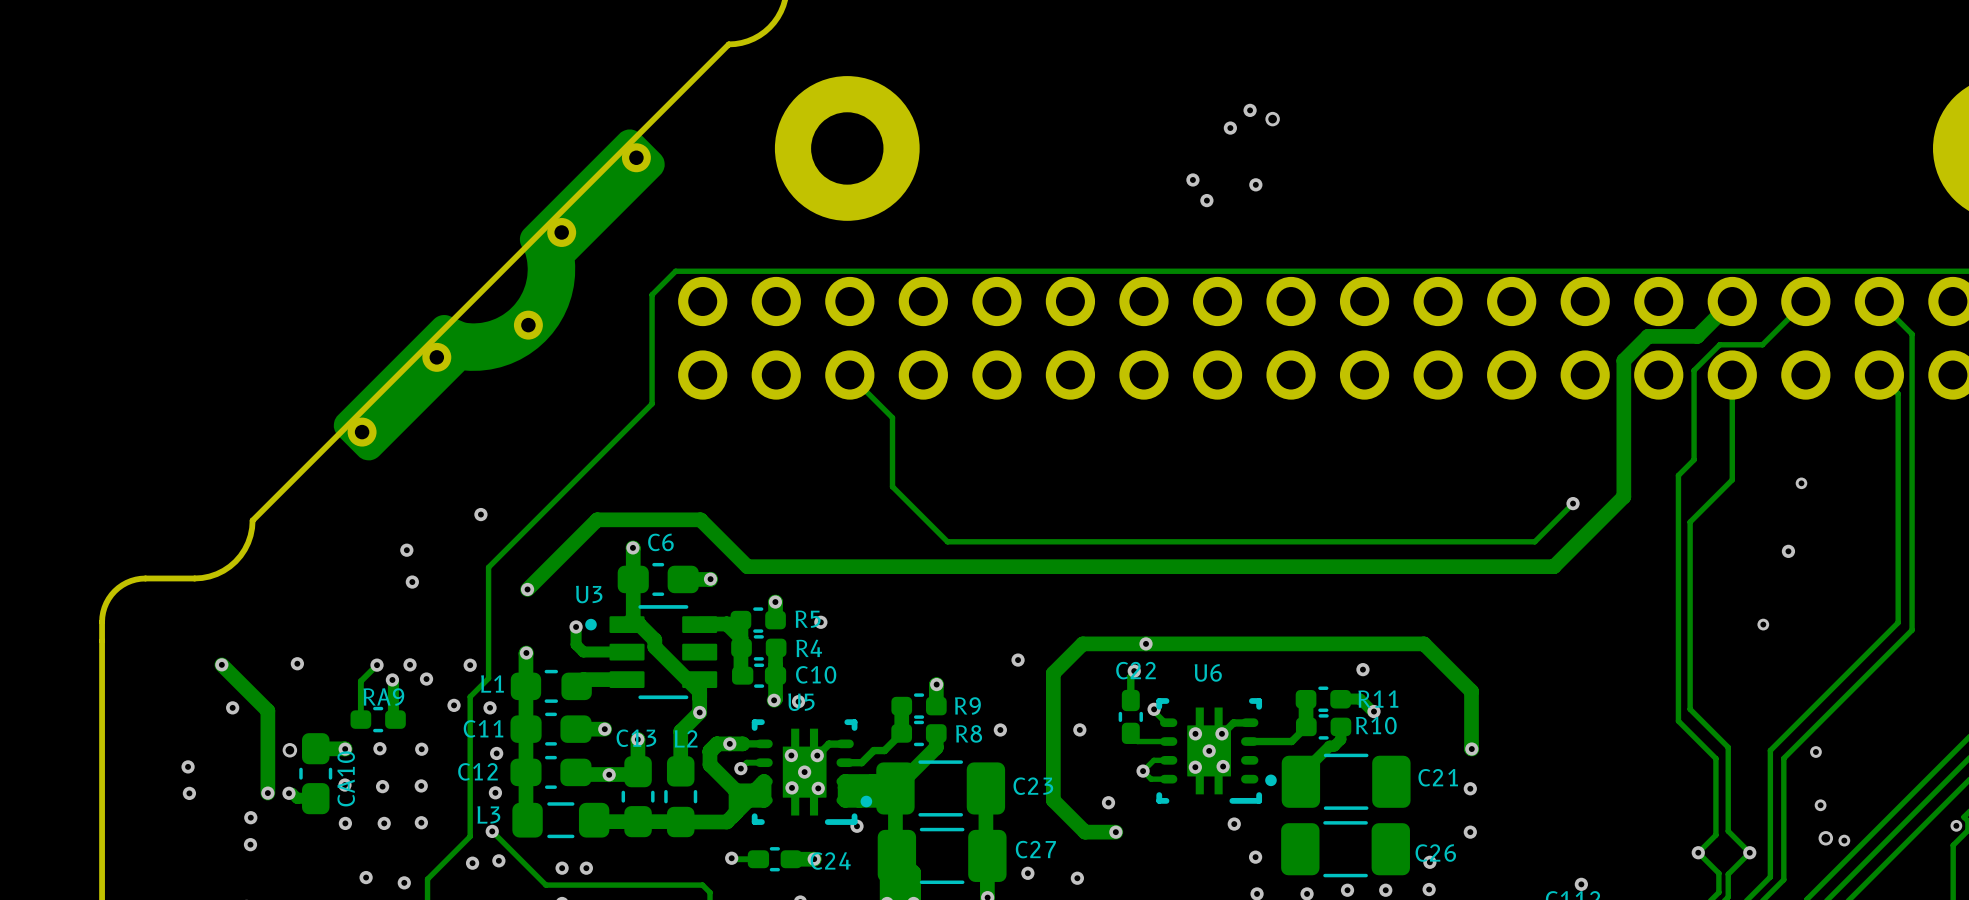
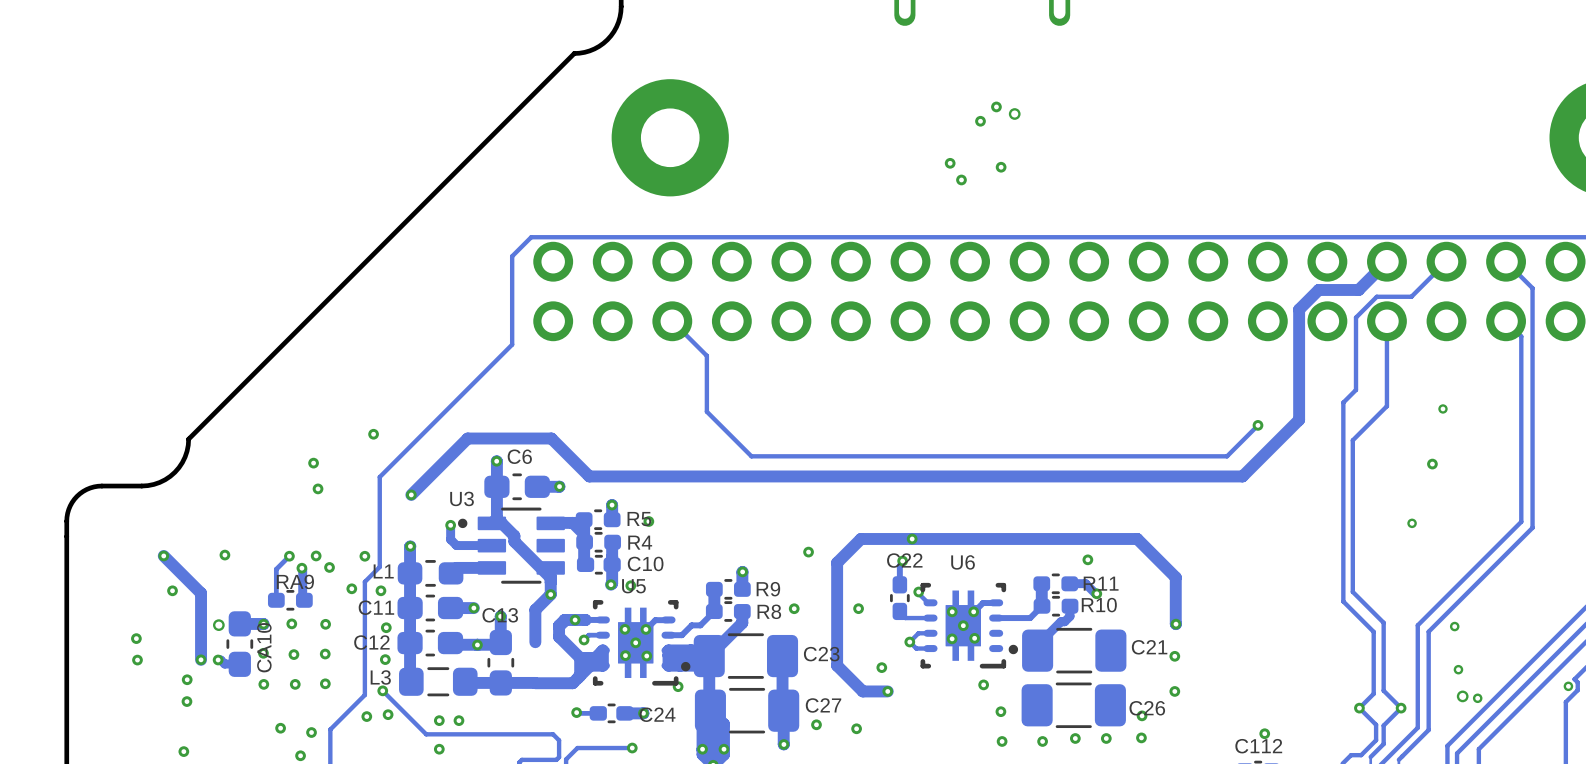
part: (499, 294) -> none
L2: (680, 796) -> none

